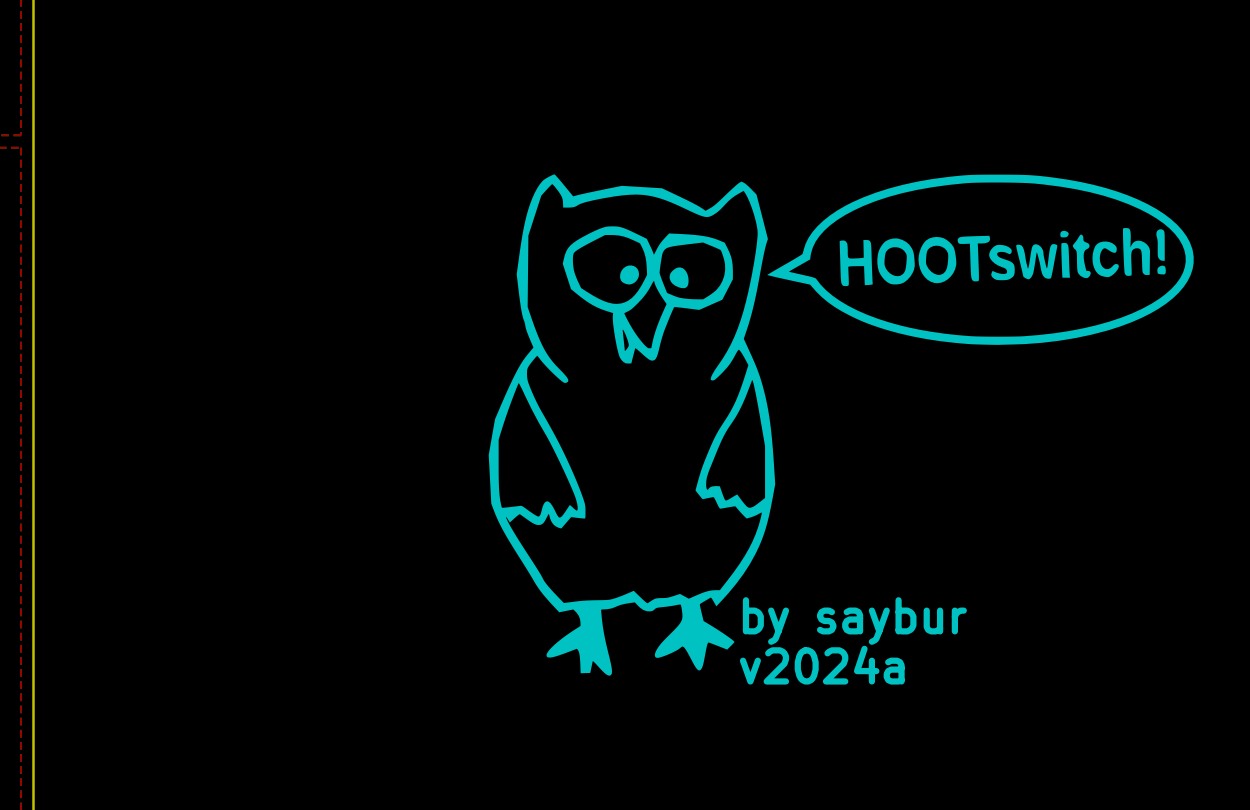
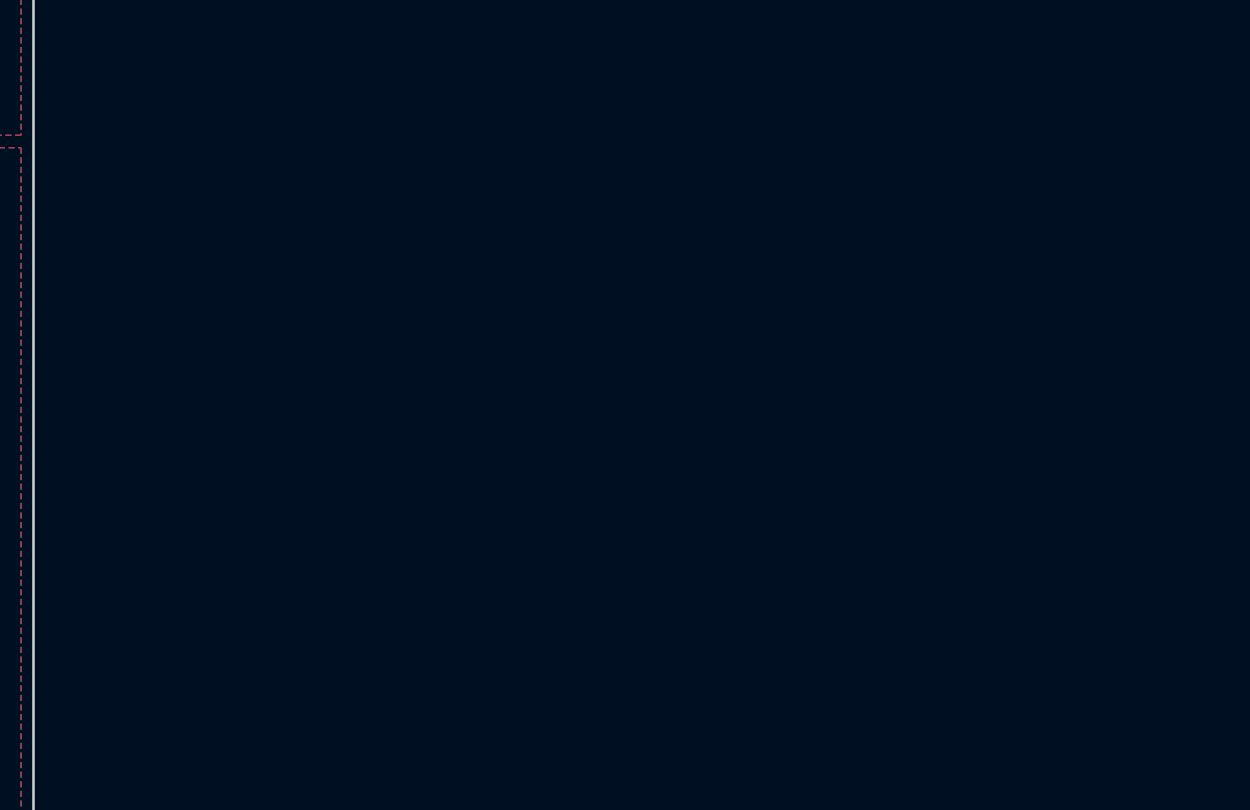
drawing: [488, 174, 1194, 676] -> none
text: by saybur (854, 621) -> none
text: v2024a (822, 665) -> none

